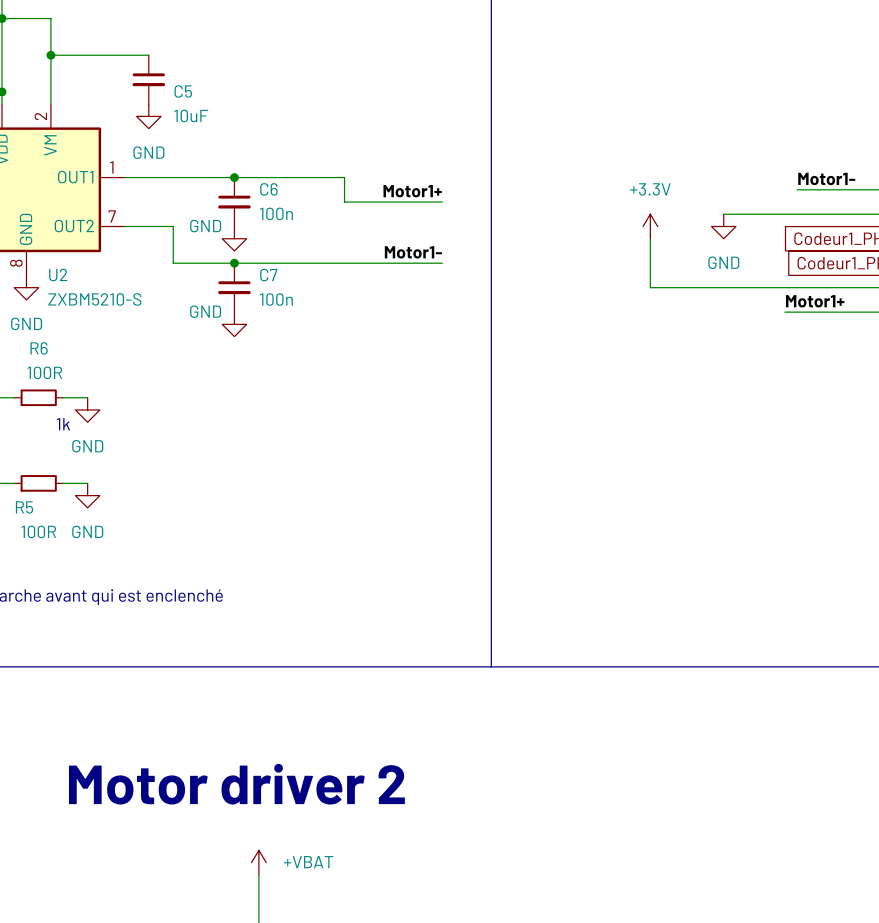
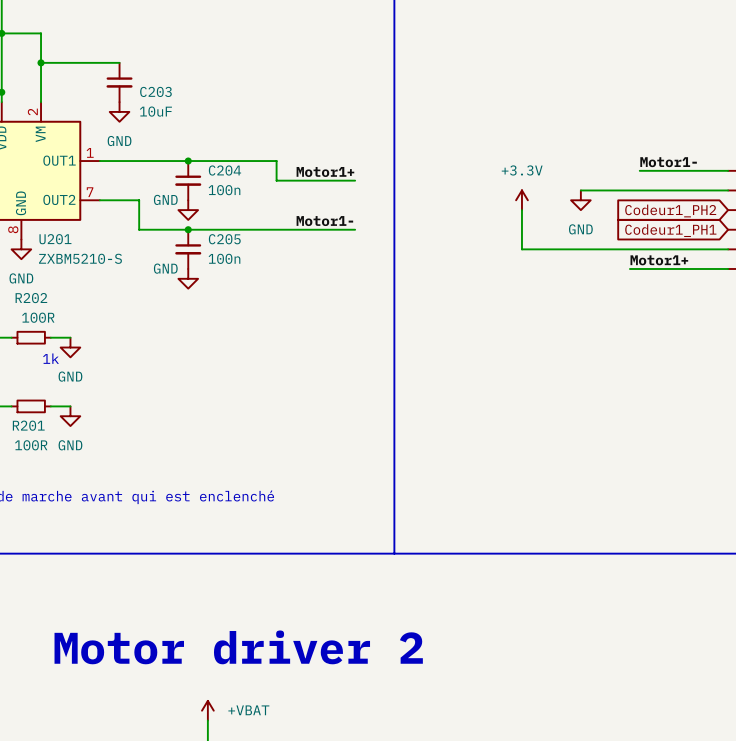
C5 name: C5 (183, 91) -> C203 (155, 91)
C6 name: C6 (268, 189) -> C204 (224, 170)
U2 name: U2 (58, 274) -> U201 (55, 239)
C7 name: C7 (268, 275) -> C205 (224, 239)
R6 name: R6 (39, 348) -> R202 (31, 298)
R5 name: R5 (24, 507) -> R201 (28, 425)

